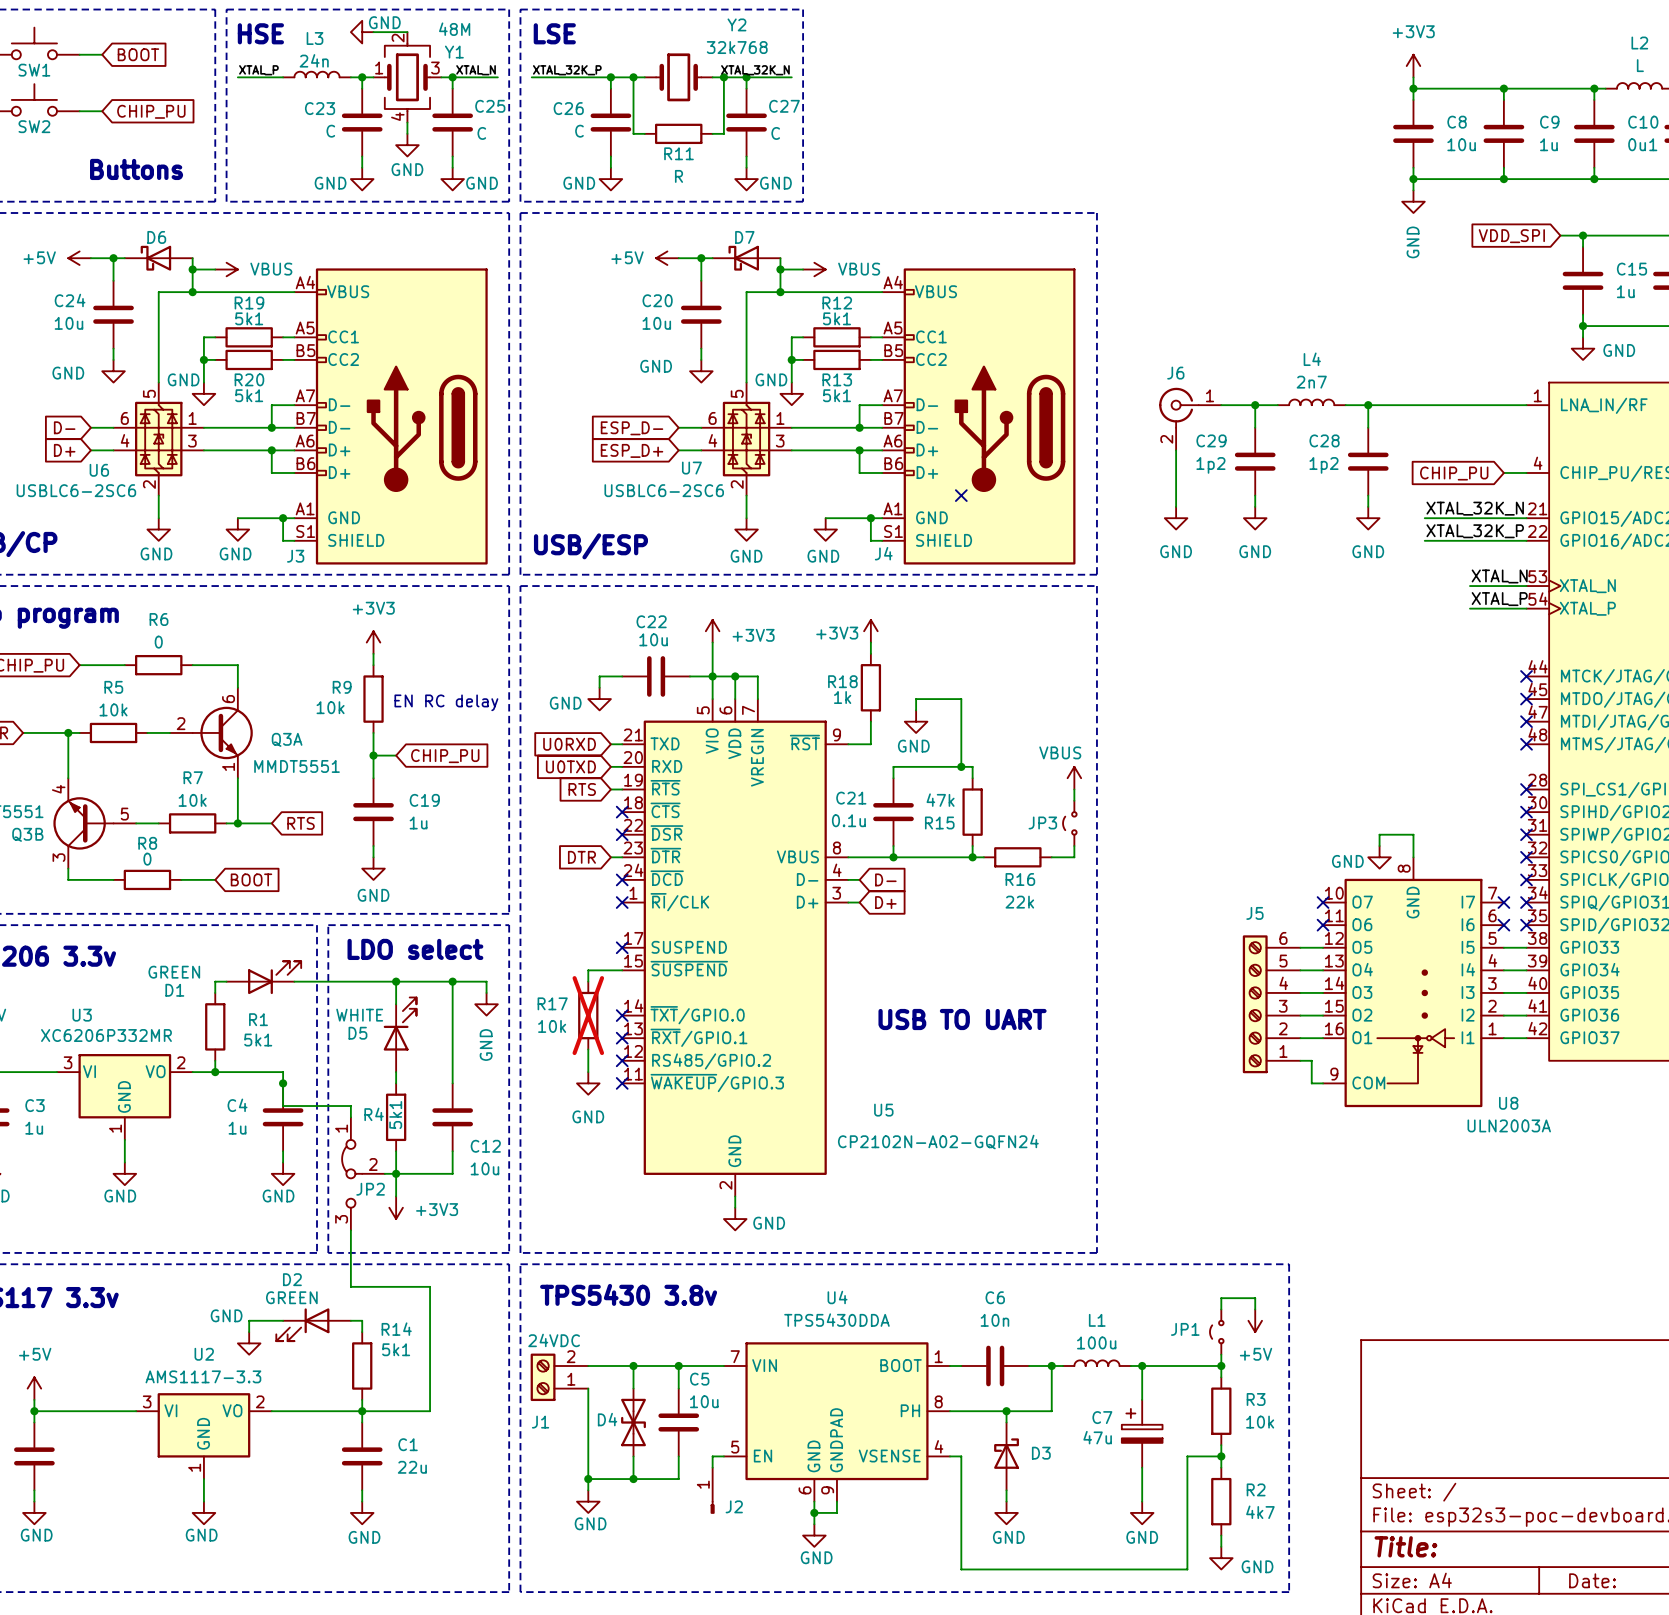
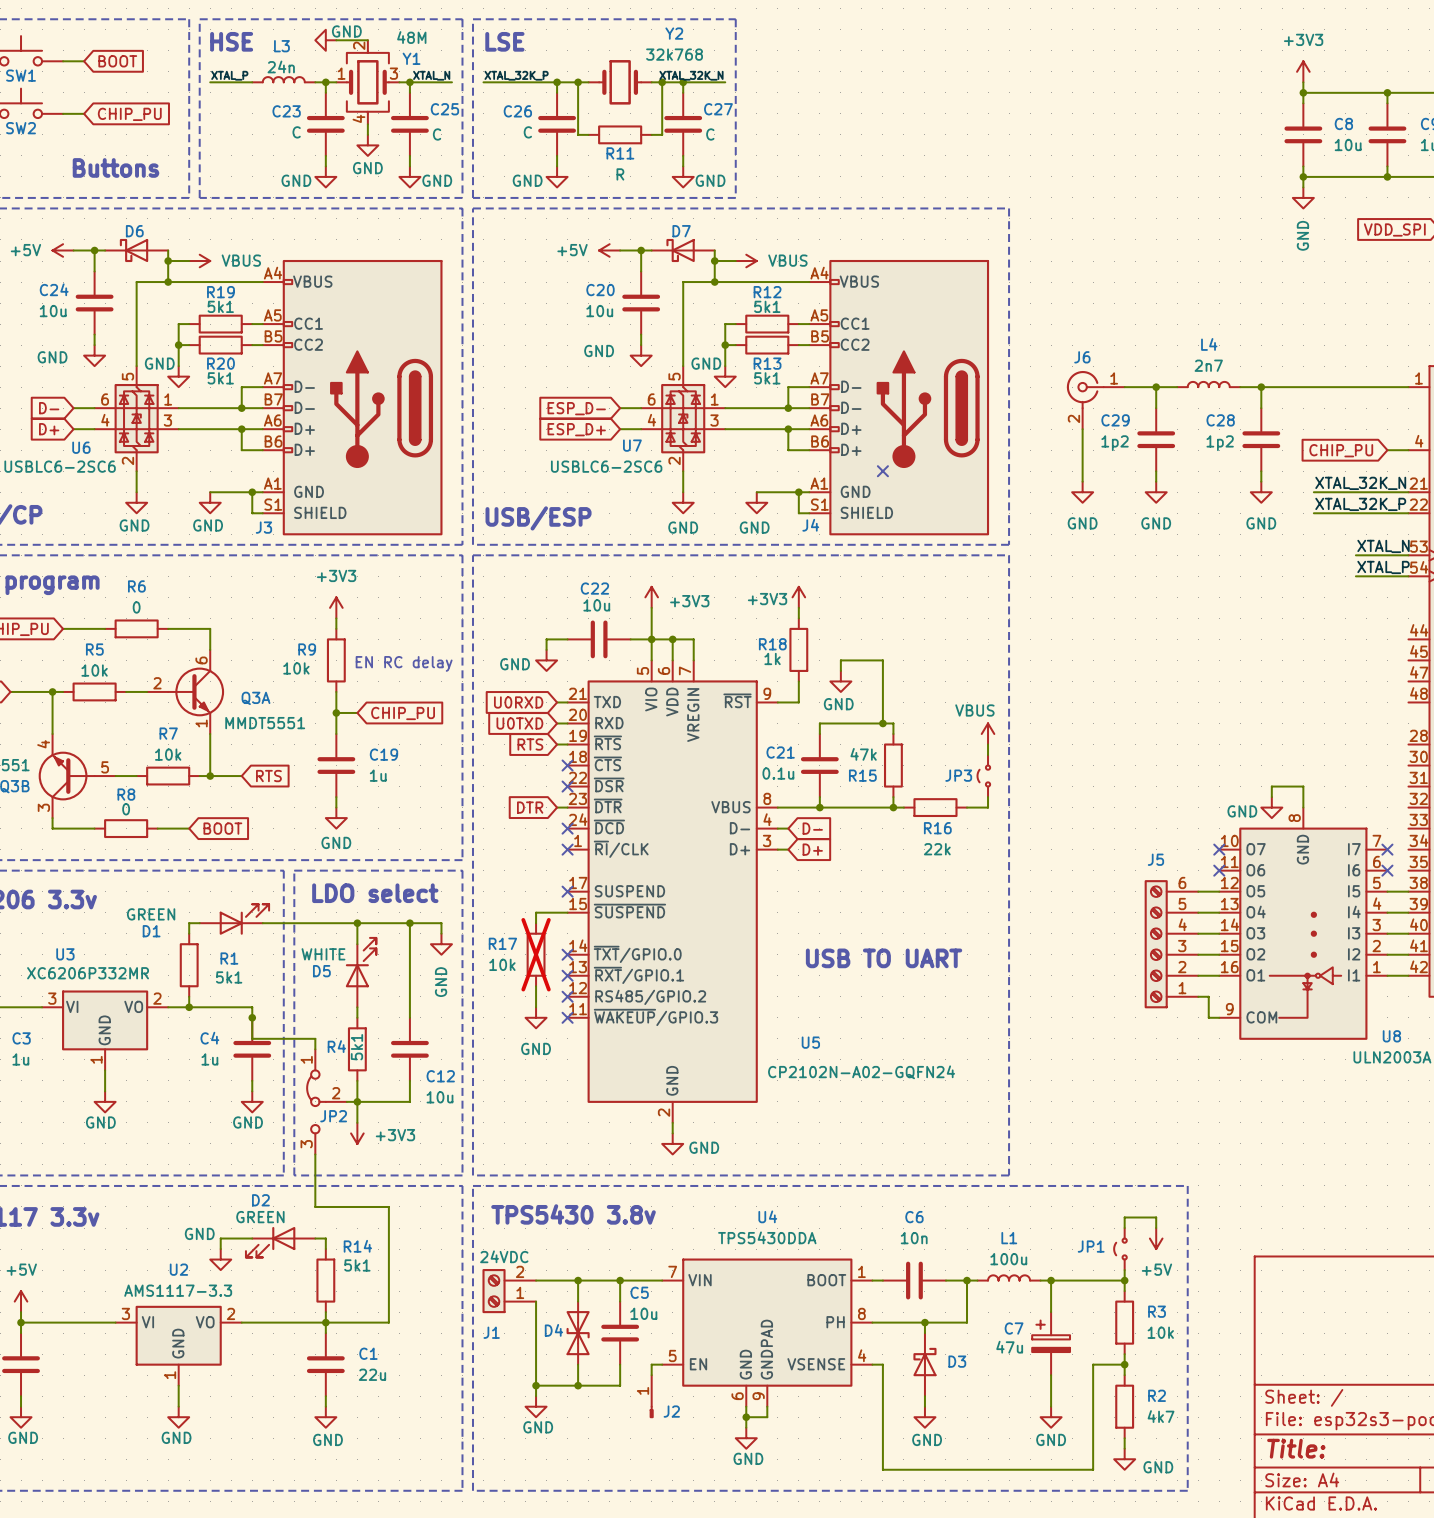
no-connect mark: (1526, 676) -> none
no-connect mark: (1526, 699) -> none
no-connect mark: (1526, 721) -> none
no-connect mark: (1526, 744) -> none
no-connect mark: (1526, 789) -> none
no-connect mark: (1526, 812) -> none
no-connect mark: (1526, 834) -> none
no-connect mark: (1526, 857) -> none
no-connect mark: (1526, 879) -> none
no-connect mark: (1526, 902) -> none
no-connect mark: (1526, 925) -> none

